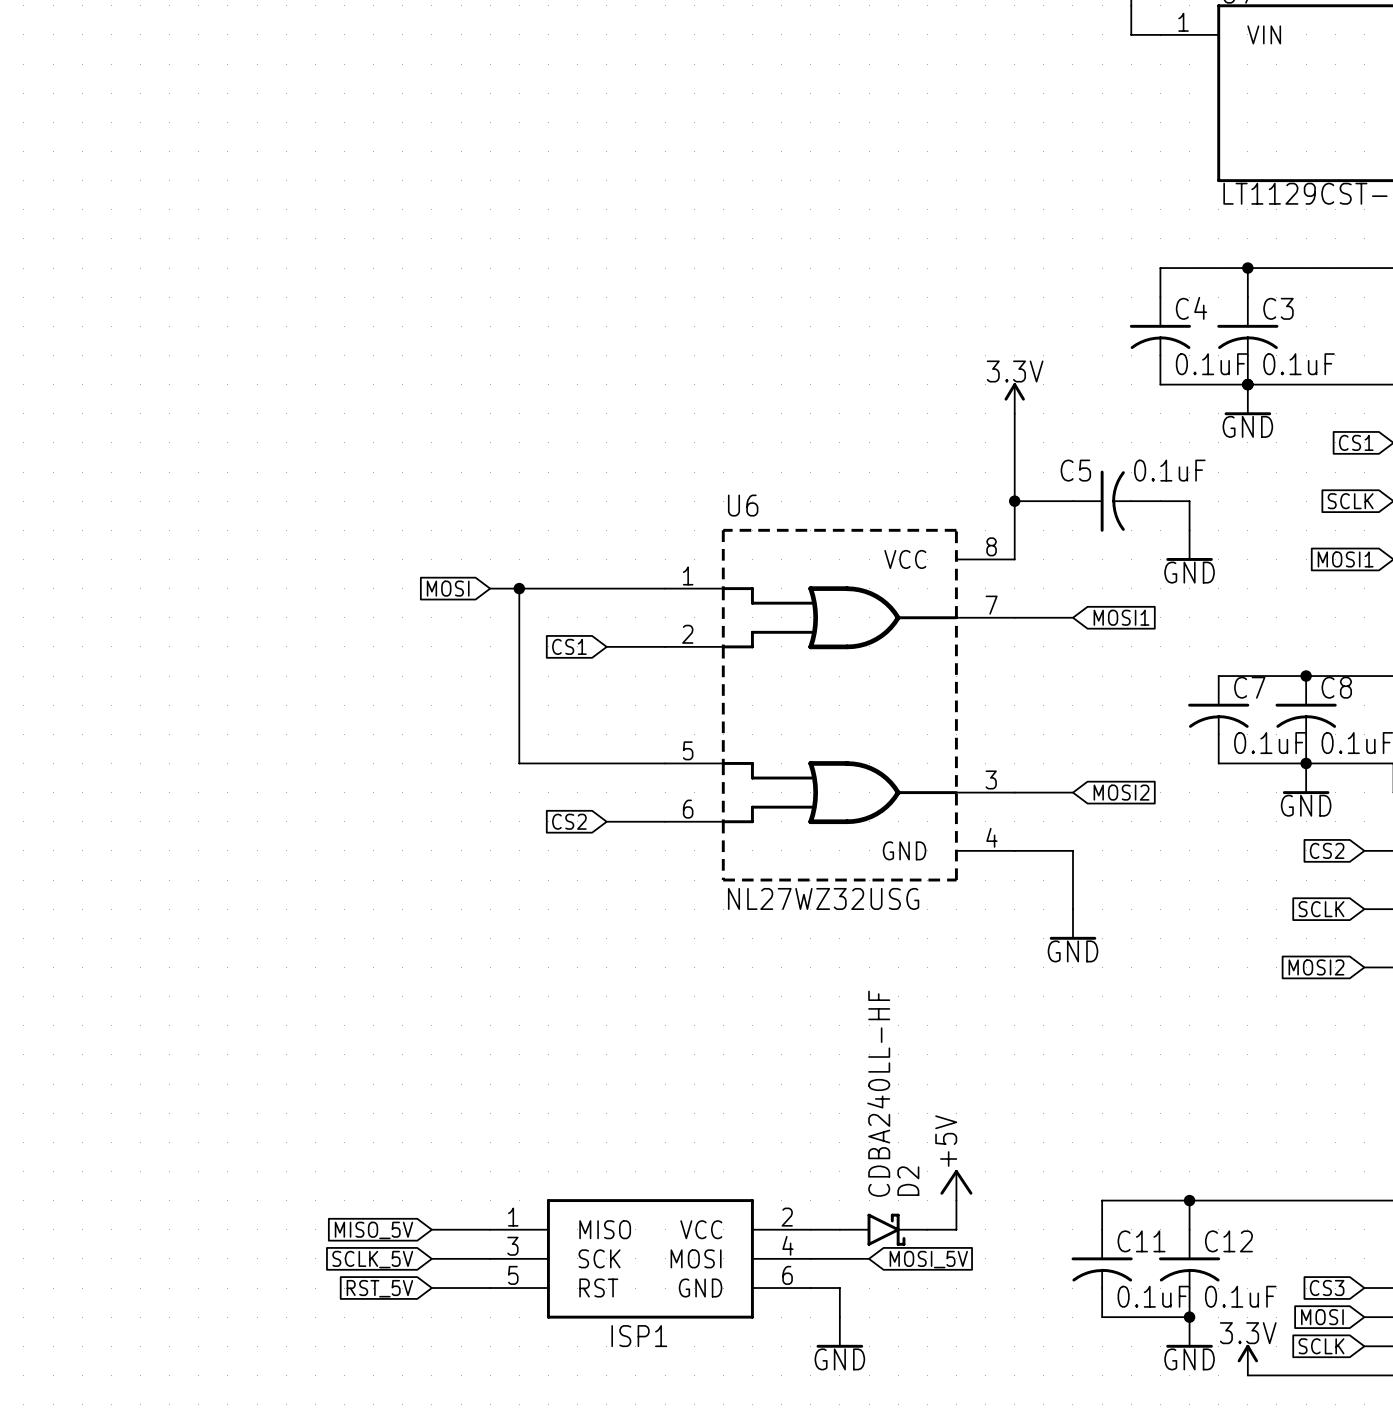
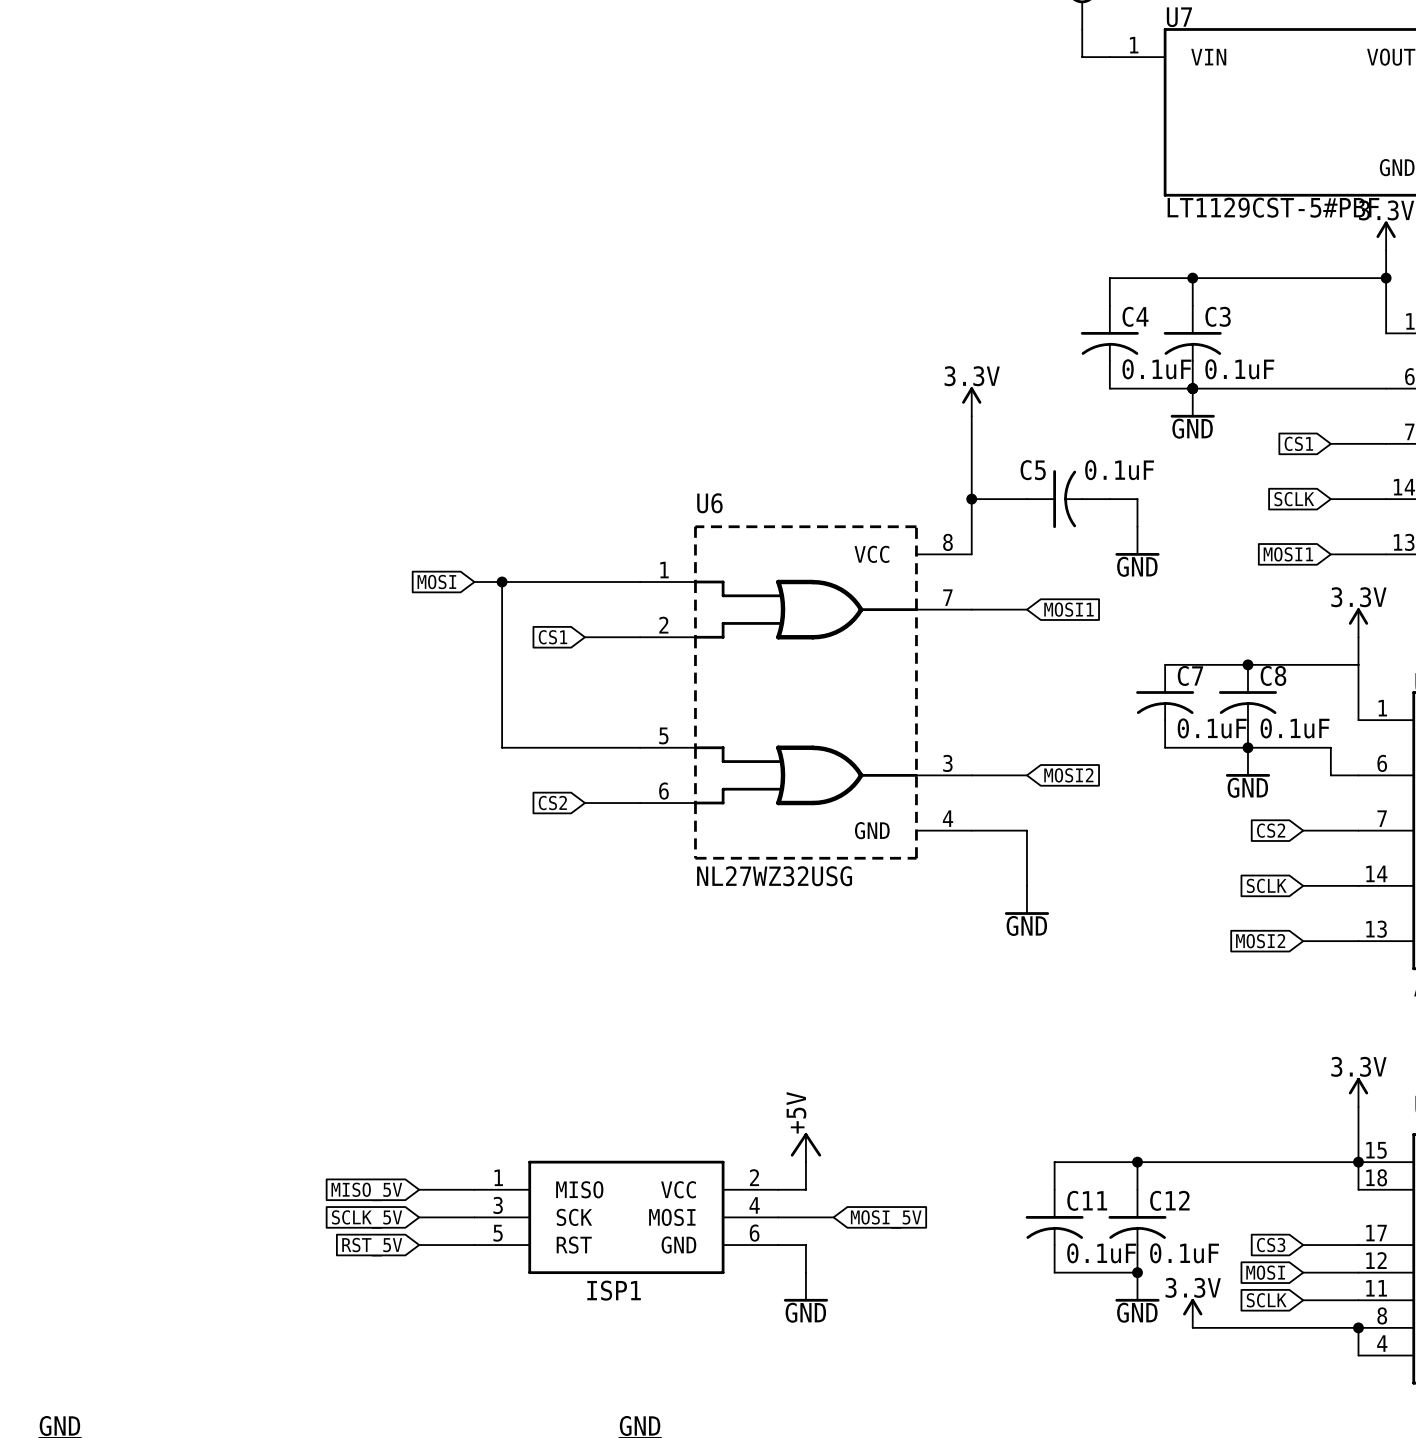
power symbol position: +5V (956, 1185) -> +5V (805, 1147)
wire: none -> (805, 1162) (805, 1189)
wire: (956, 1200) (956, 1229) (927, 1229) -> none
D2: CDBA240LL-HF (883, 1229) -> none

